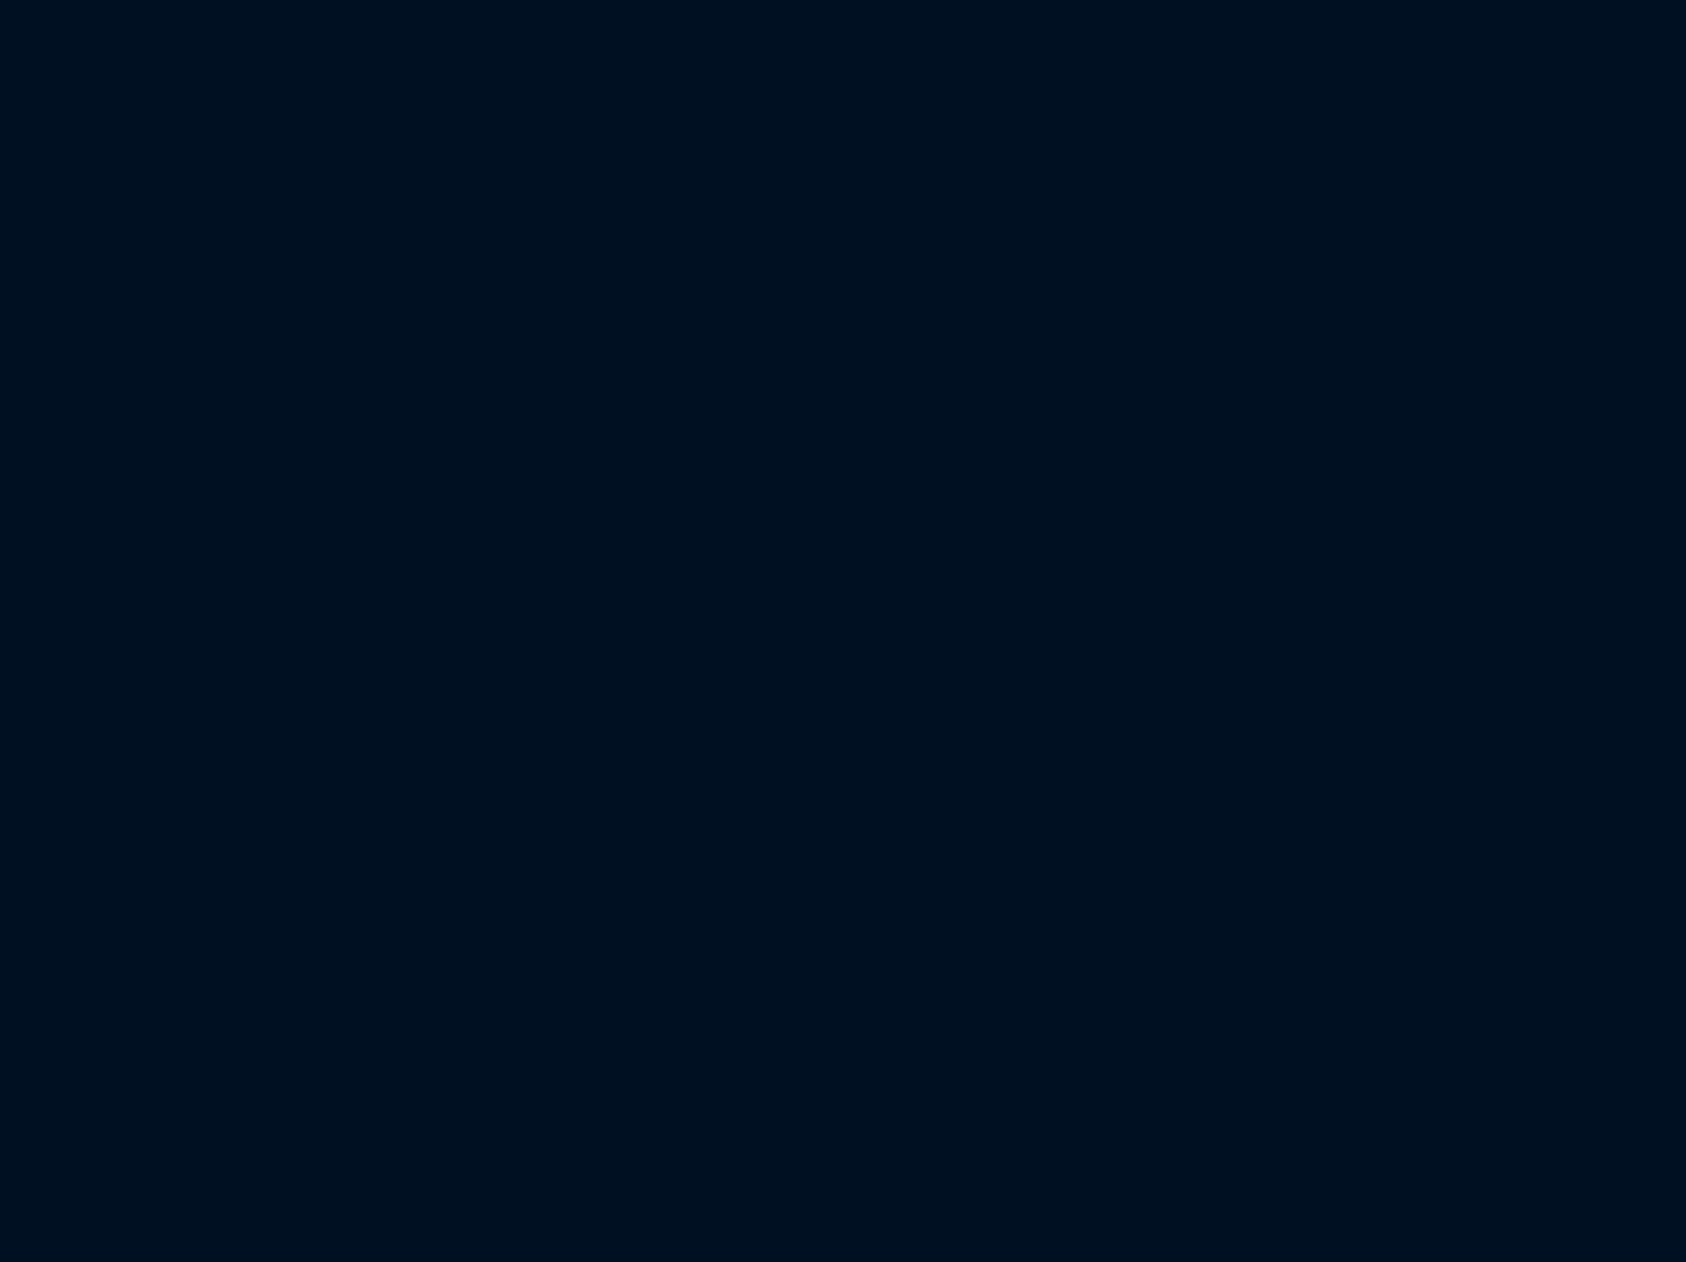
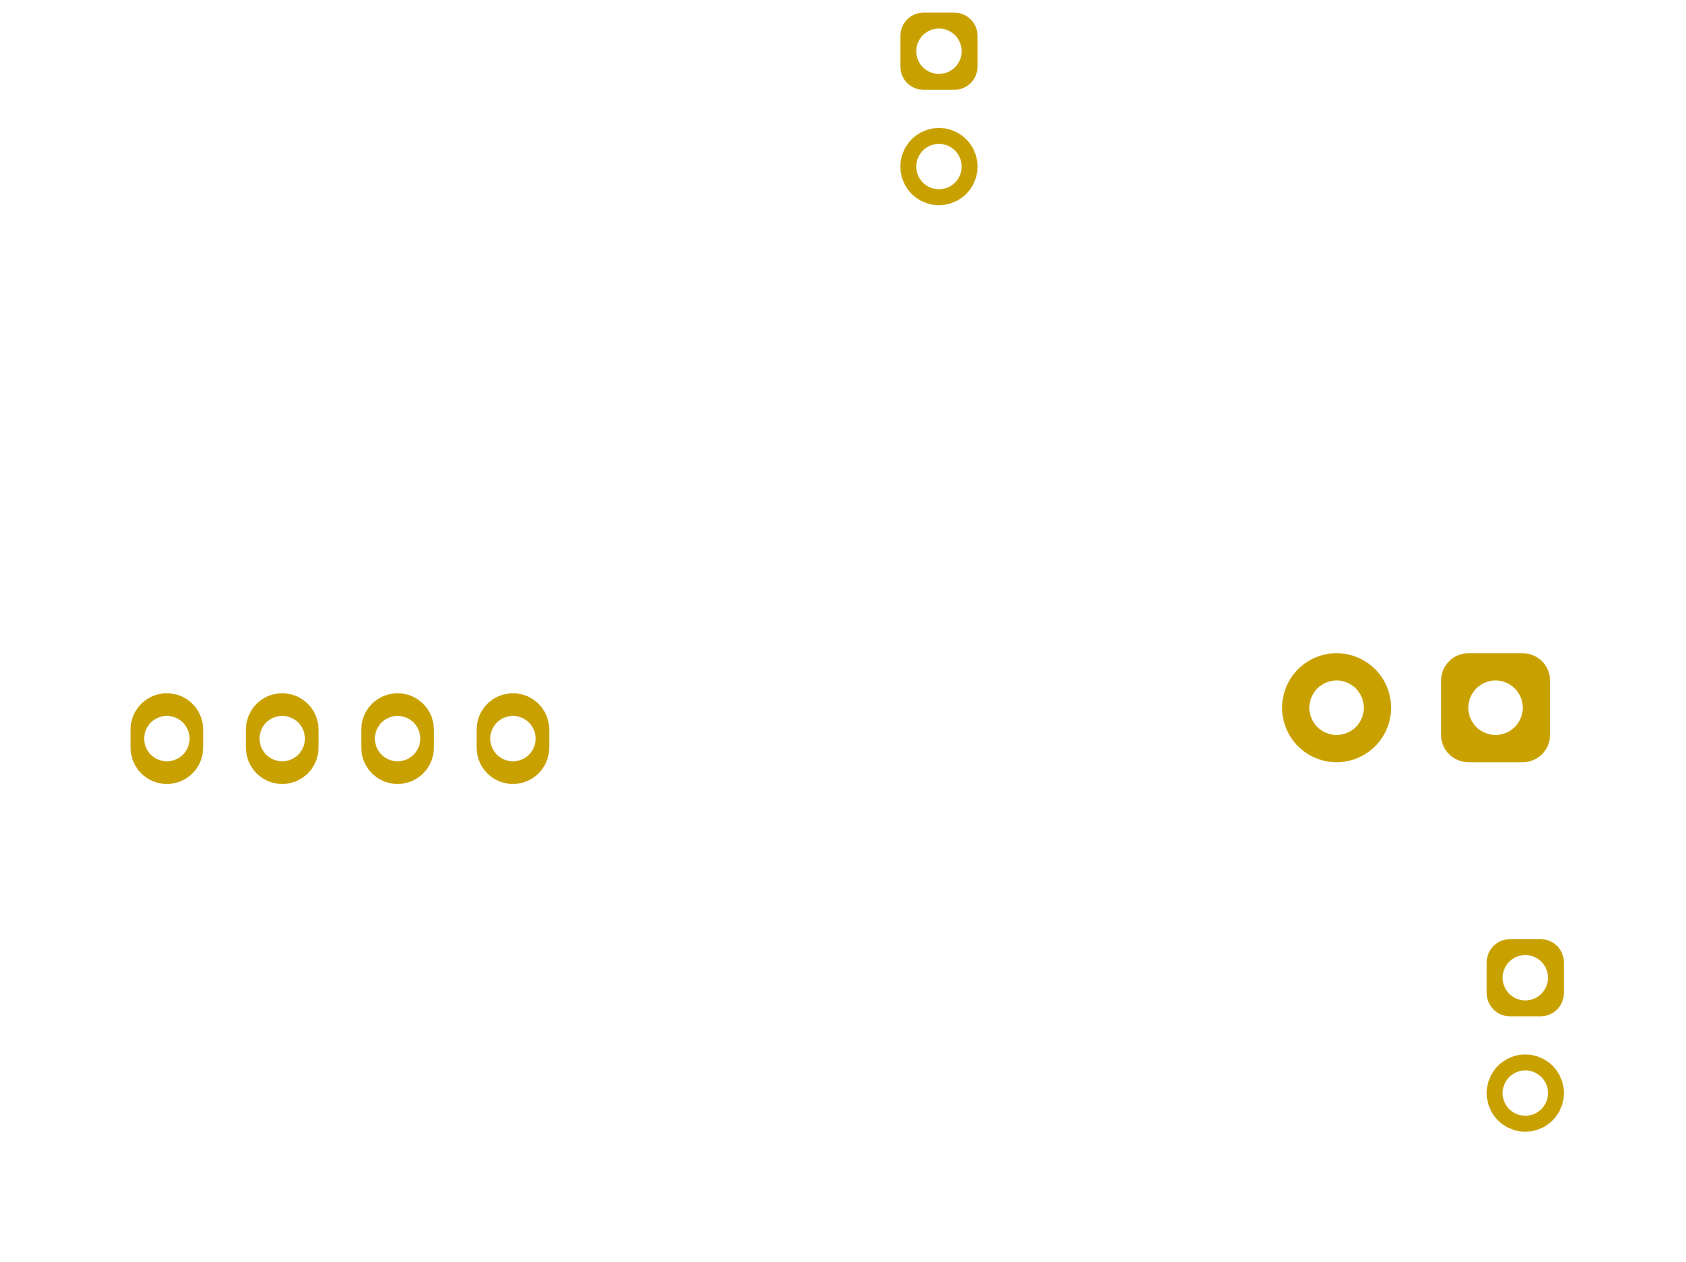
part: none -> (938, 108)
part: none -> (1416, 707)
part: none -> (339, 738)
part: none -> (1525, 1035)

